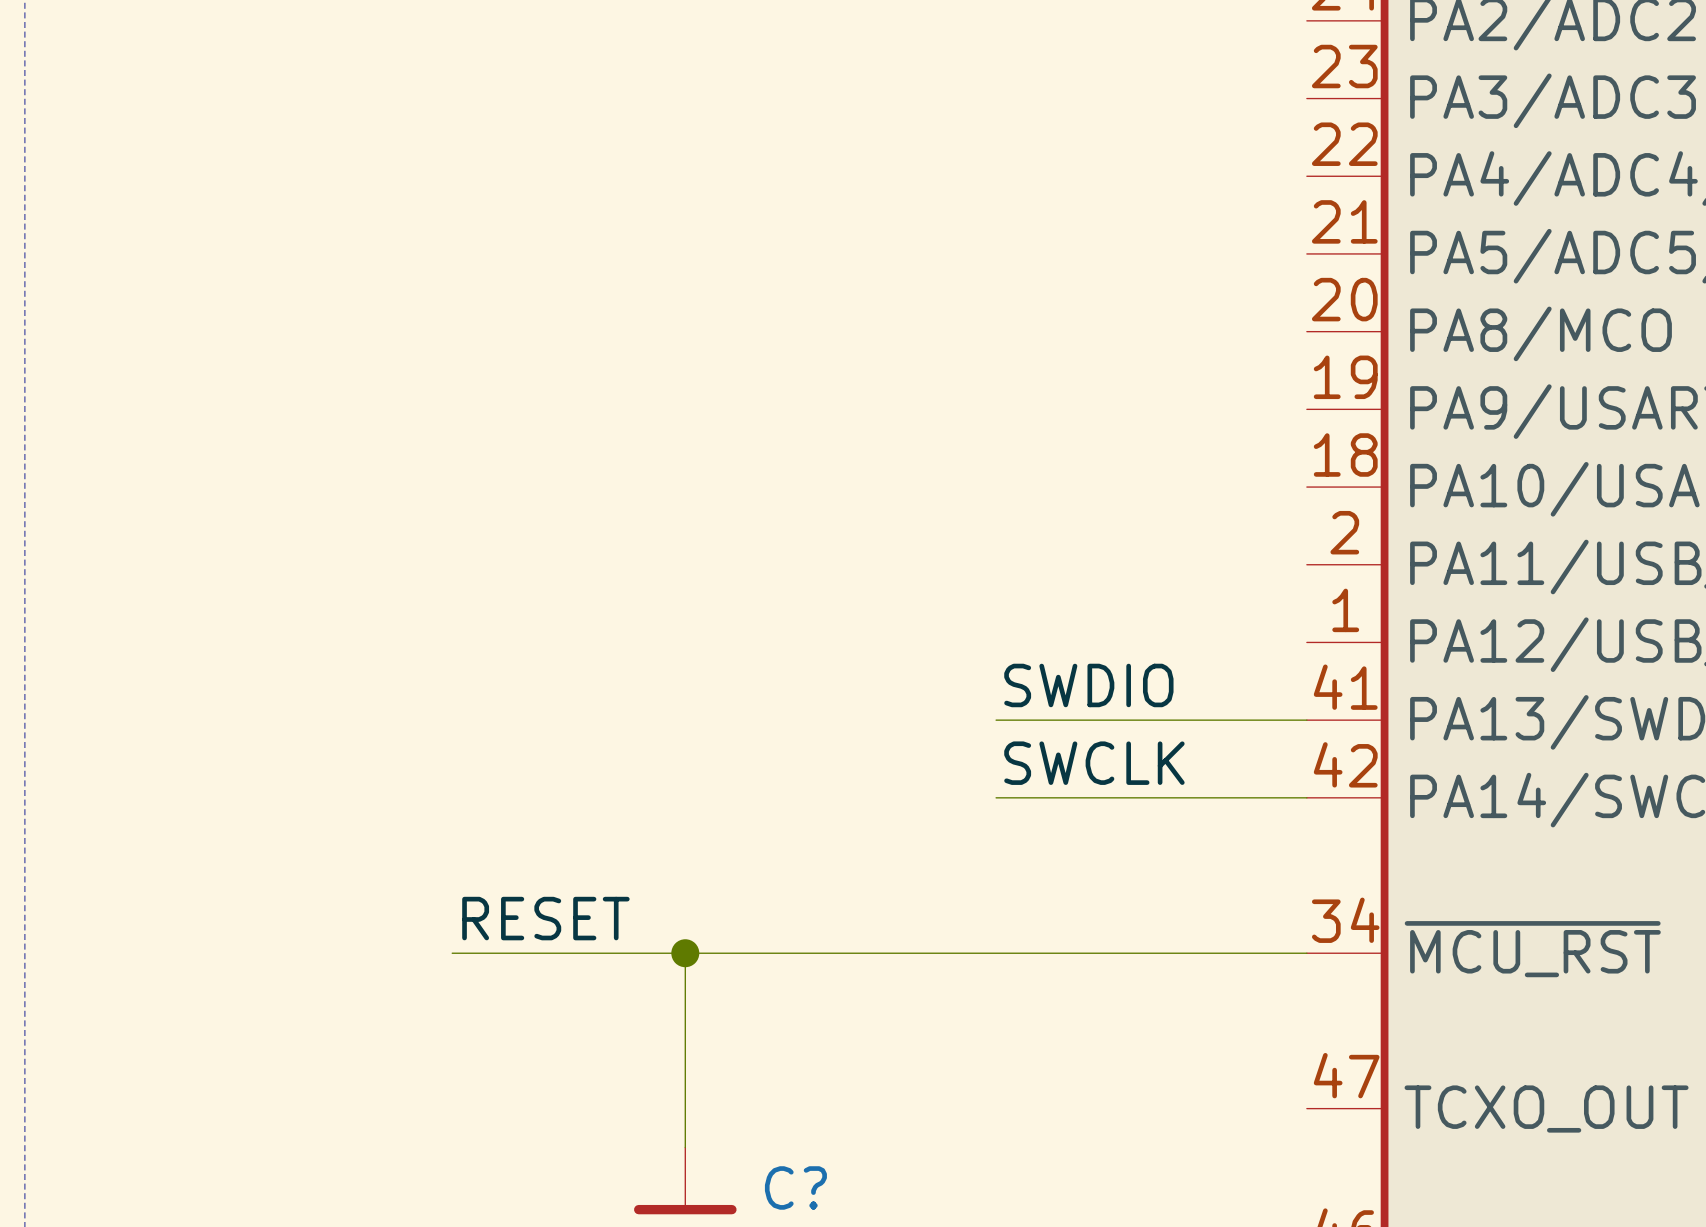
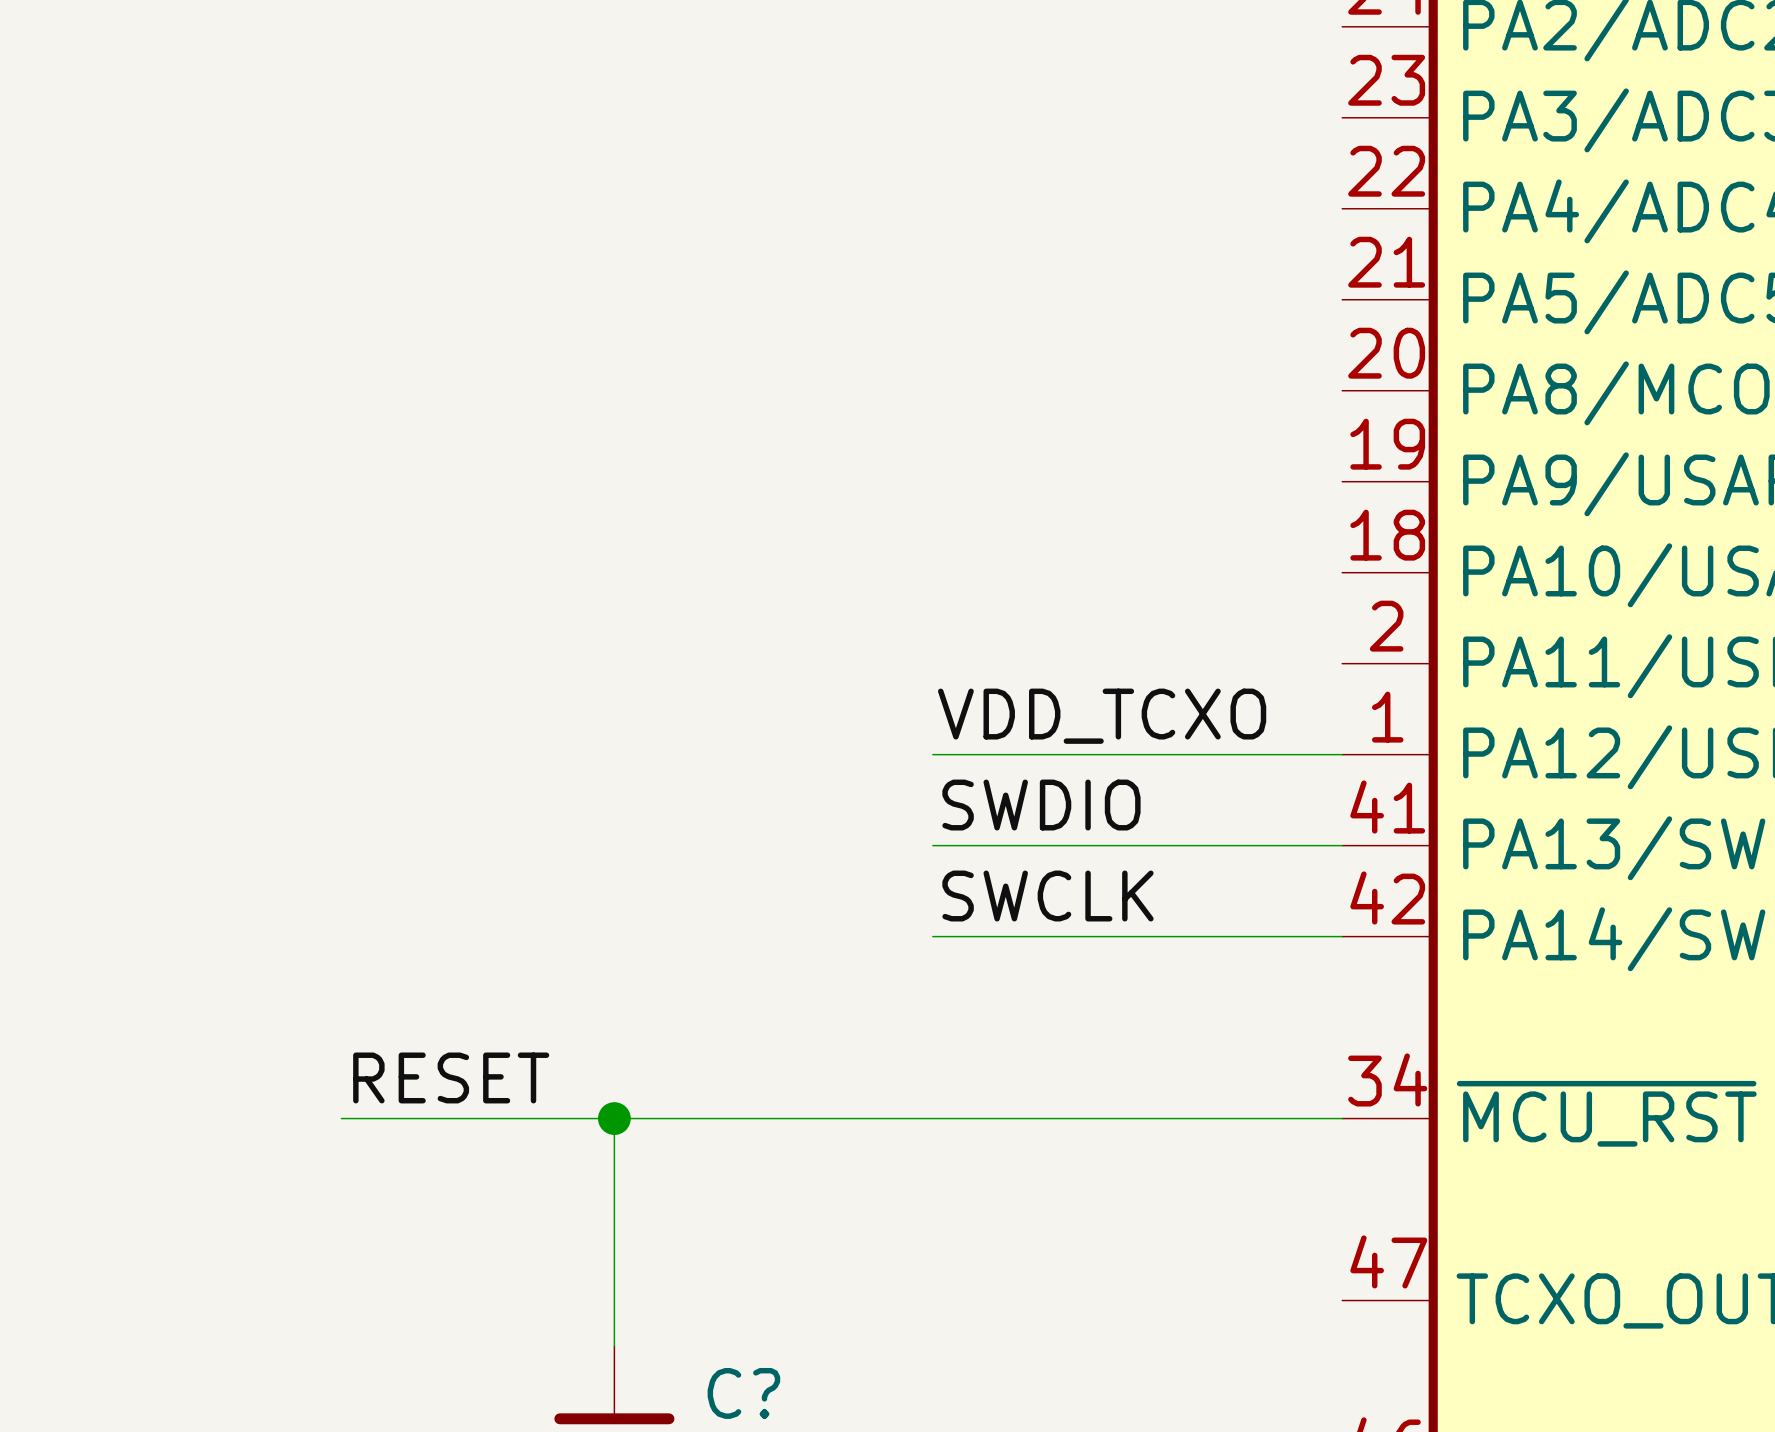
label: none -> VDD_TCXO (1102, 716)
wire: none -> (932, 754) (1342, 754)
label position: SWDIO (1088, 685) -> SWDIO (1041, 805)
wire: none -> (932, 845) (978, 845)
label position: SWCLK (1094, 763) -> SWCLK (1047, 896)
wire: none -> (932, 936) (978, 936)

